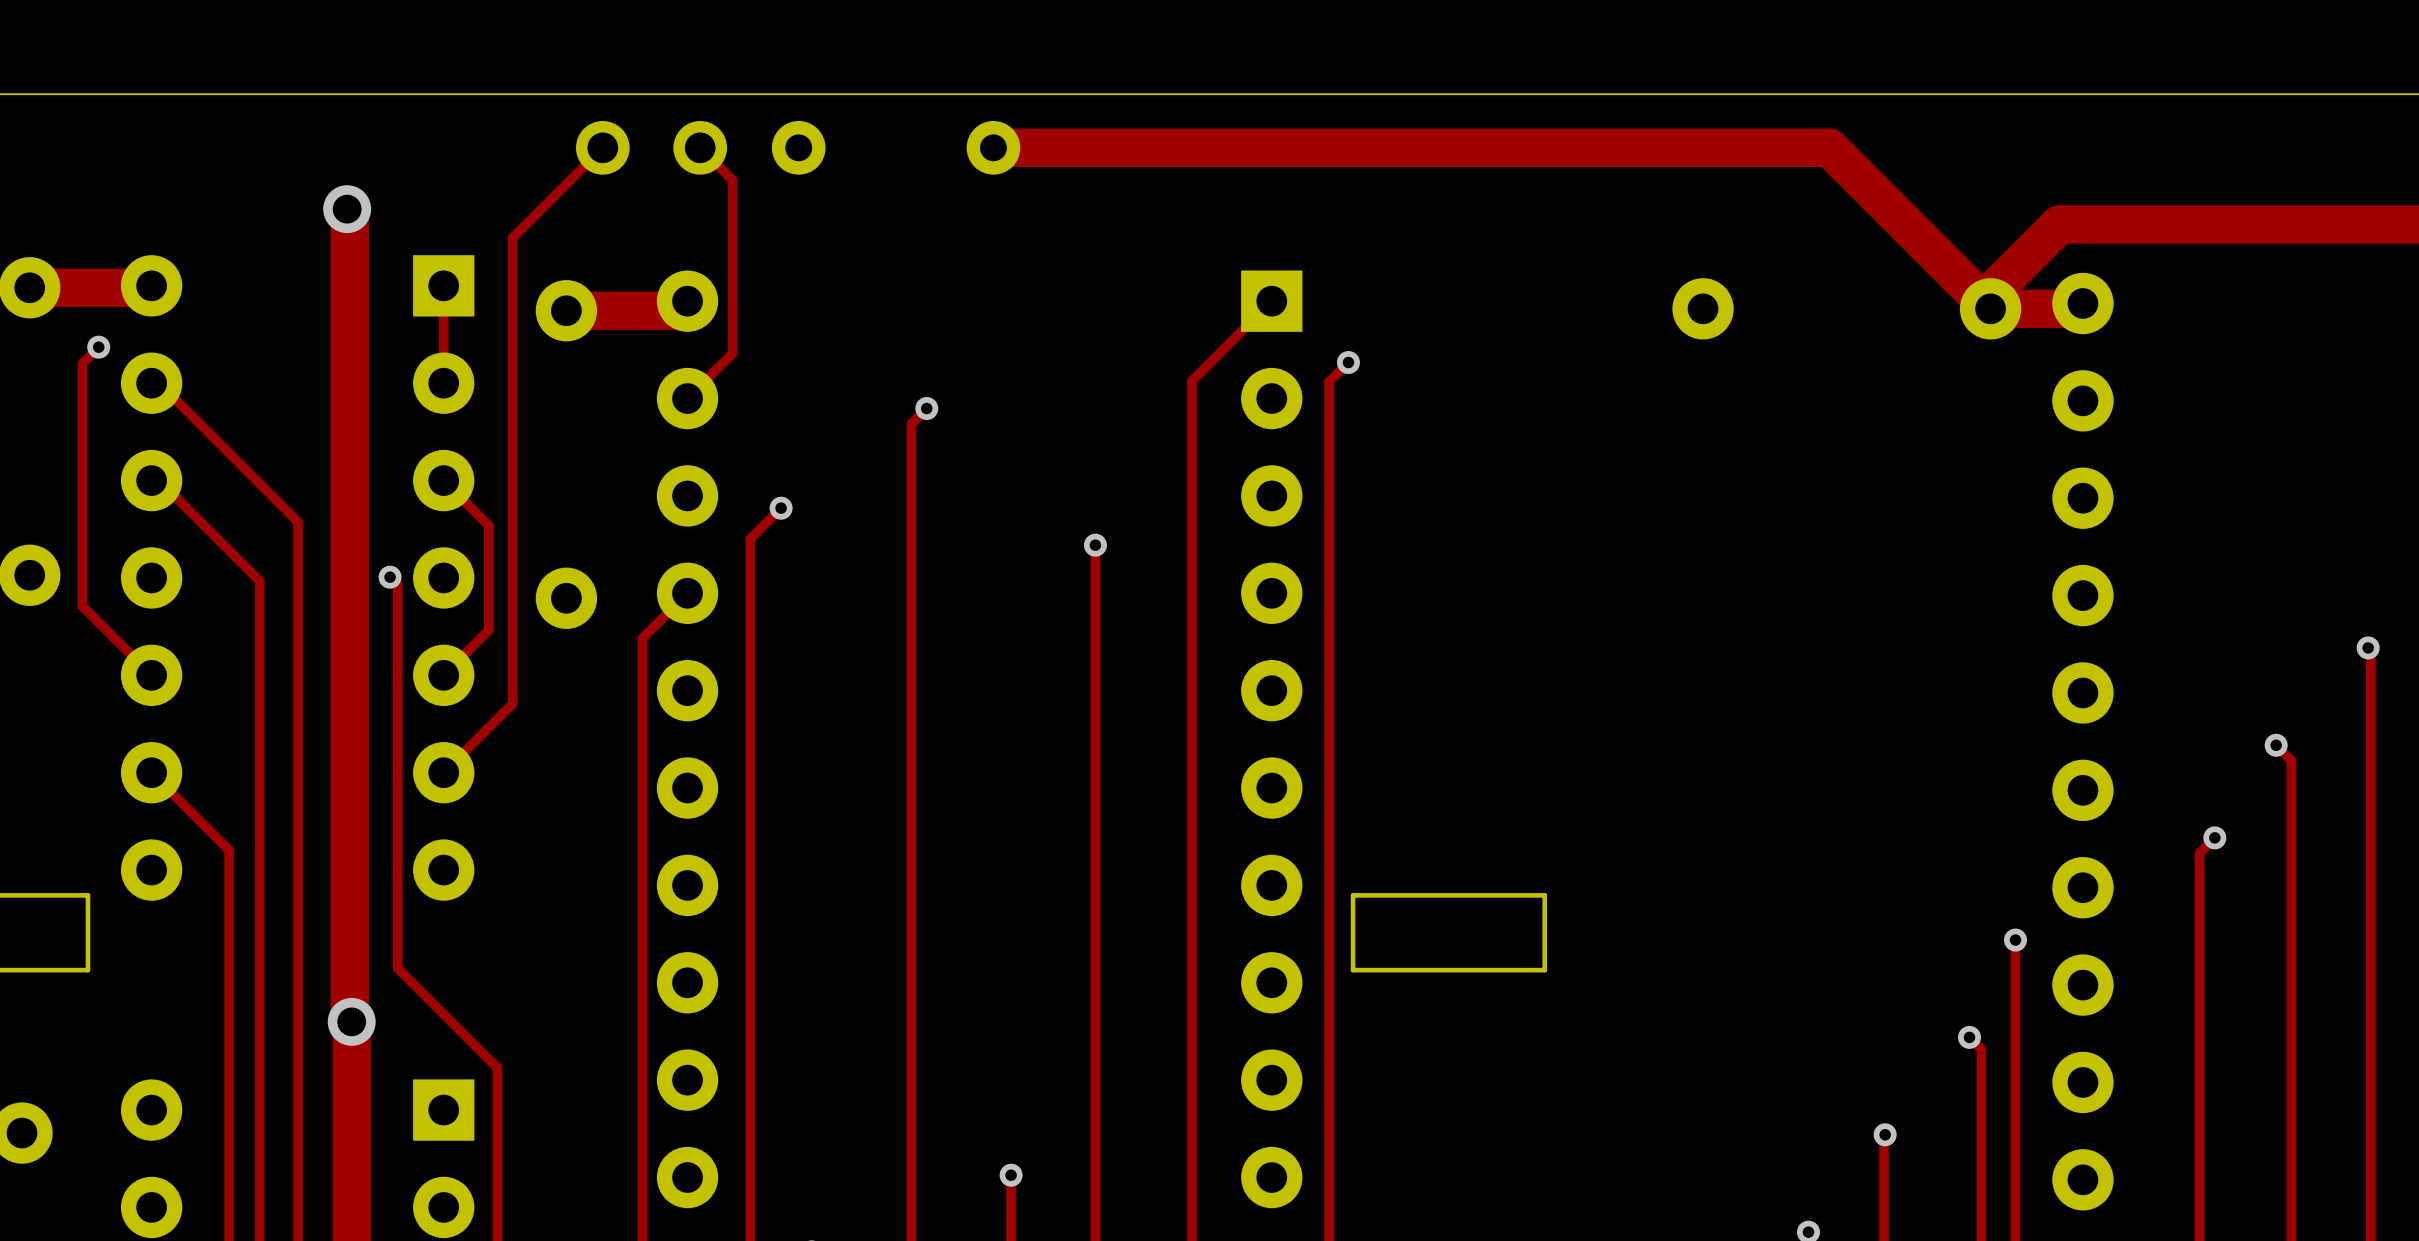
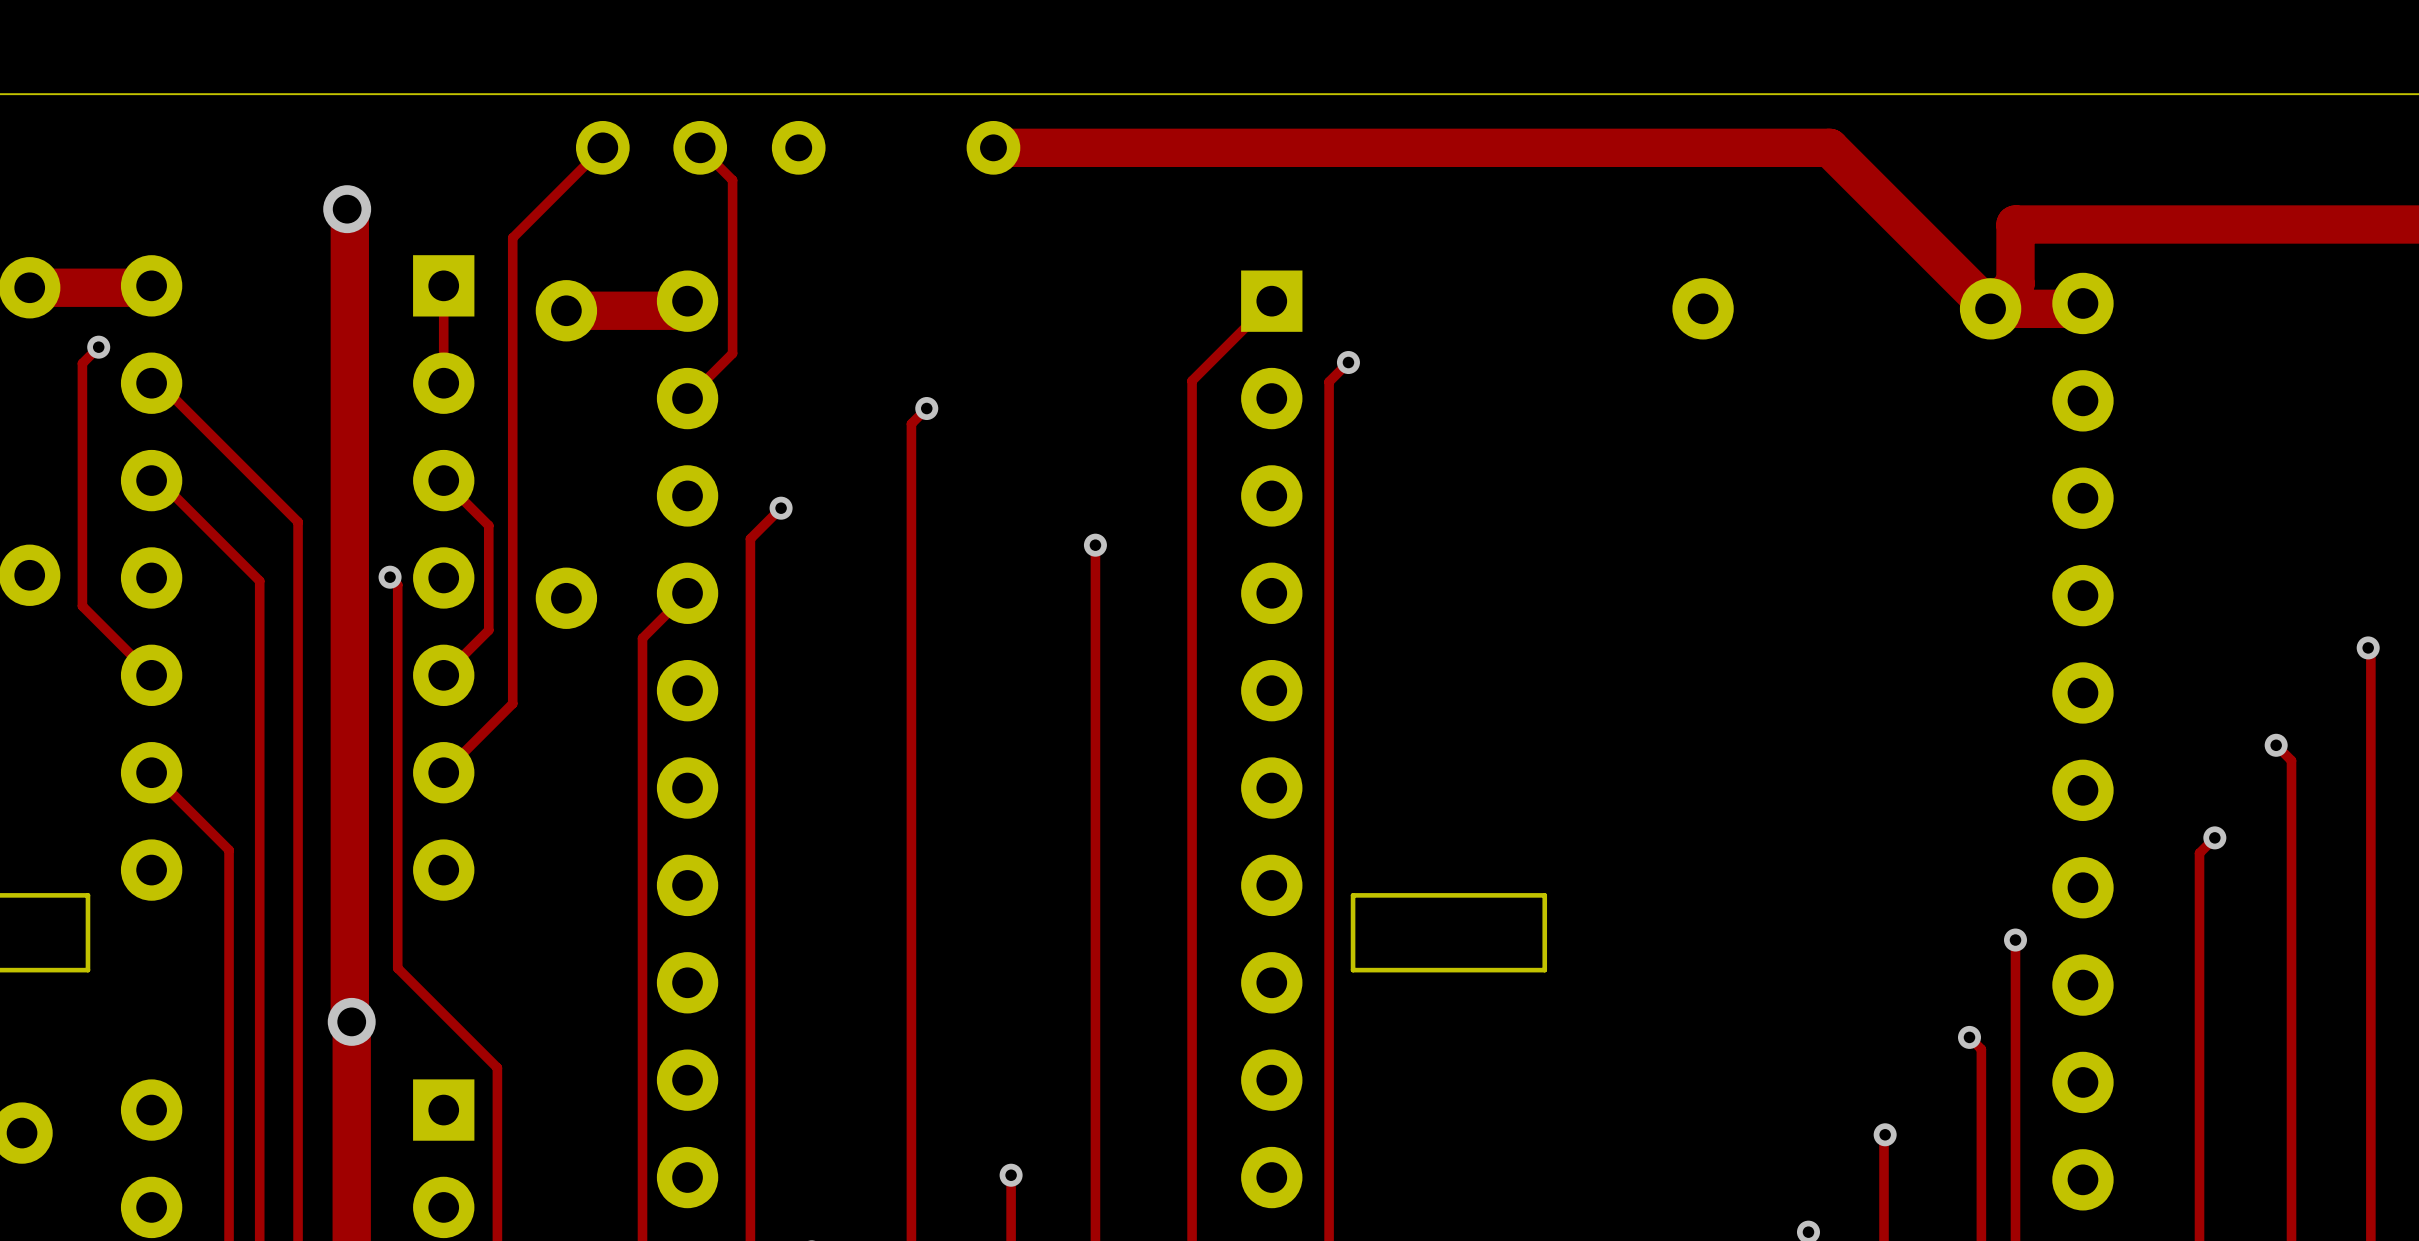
track: (2059, 224) (1990, 293) (1990, 308) -> (2059, 224) (2015, 224) (2015, 283) (1990, 308)

